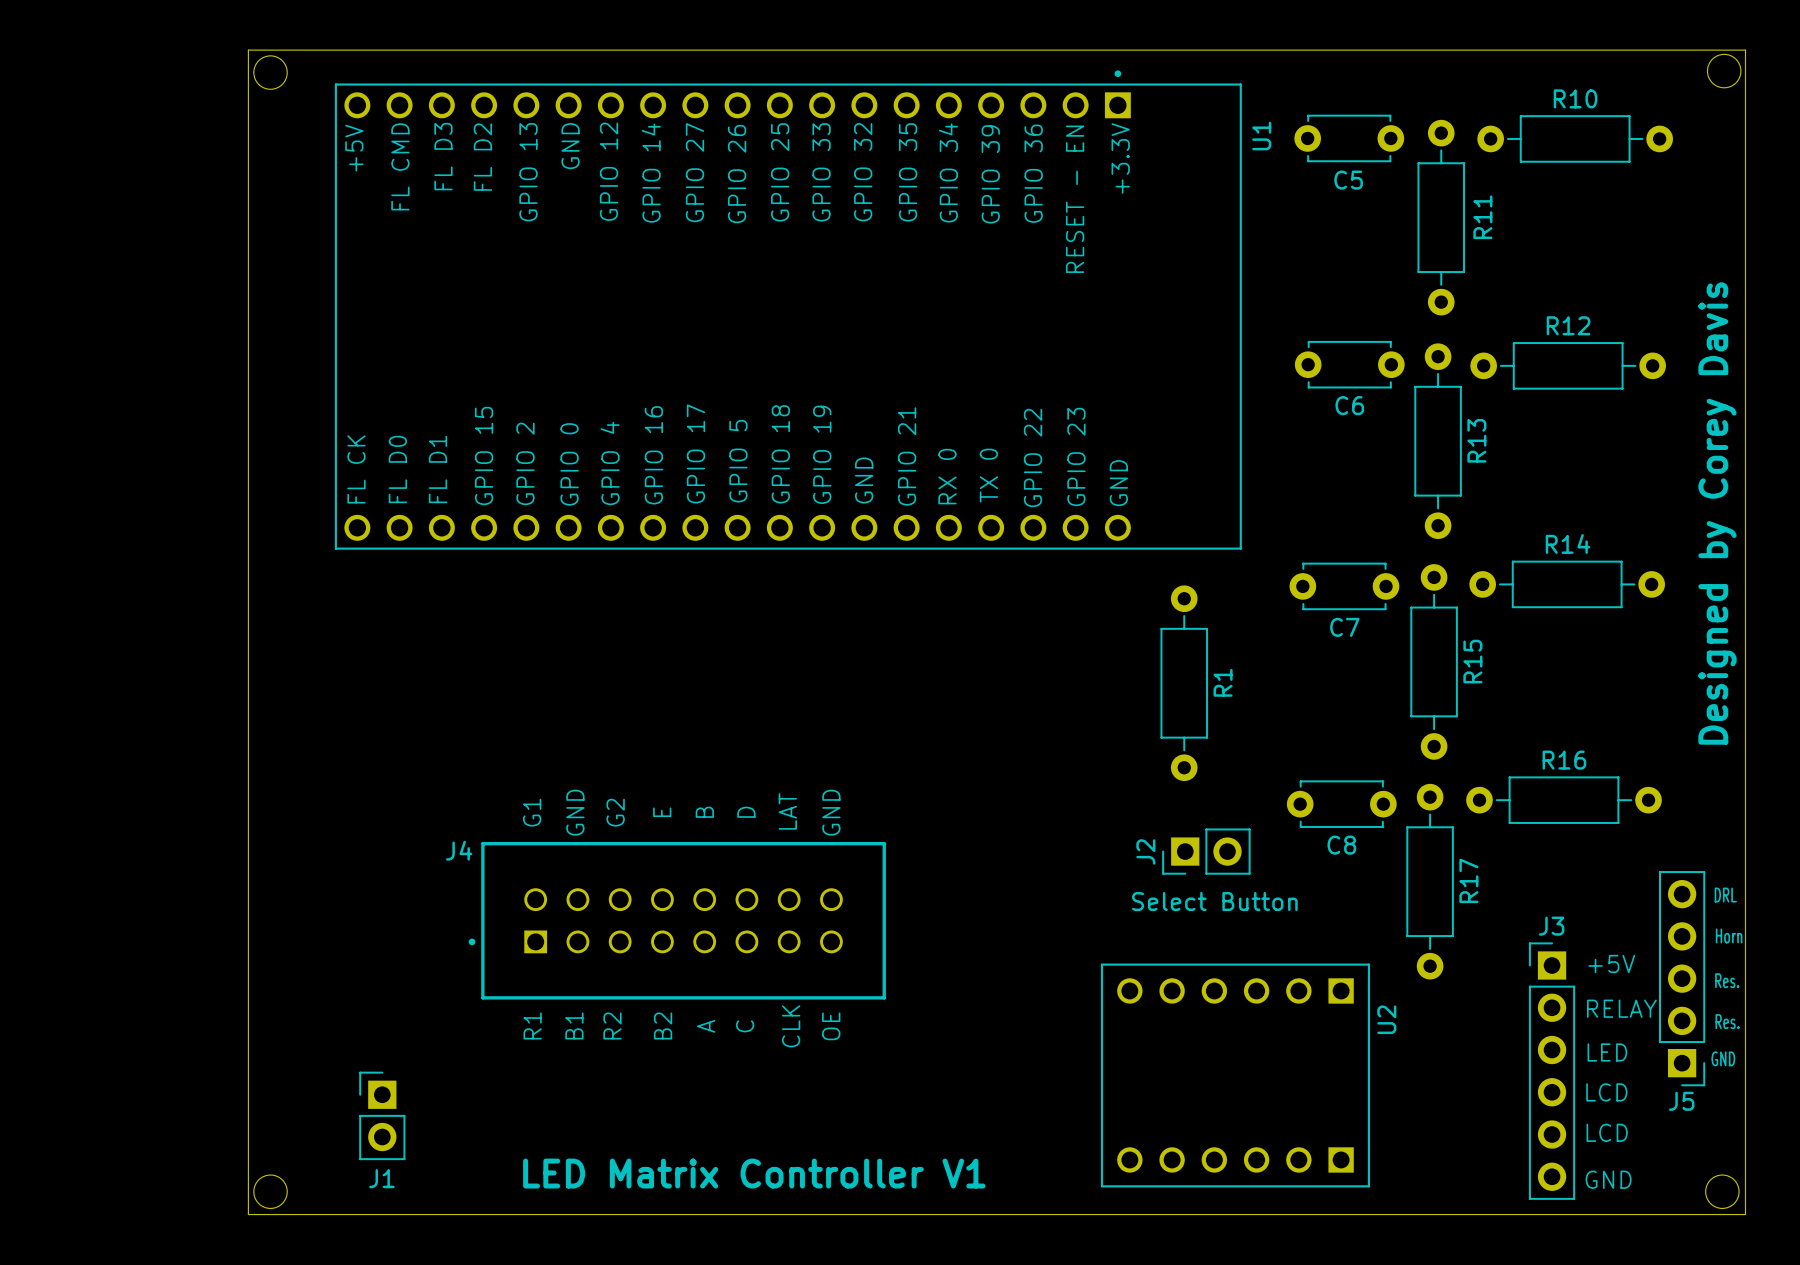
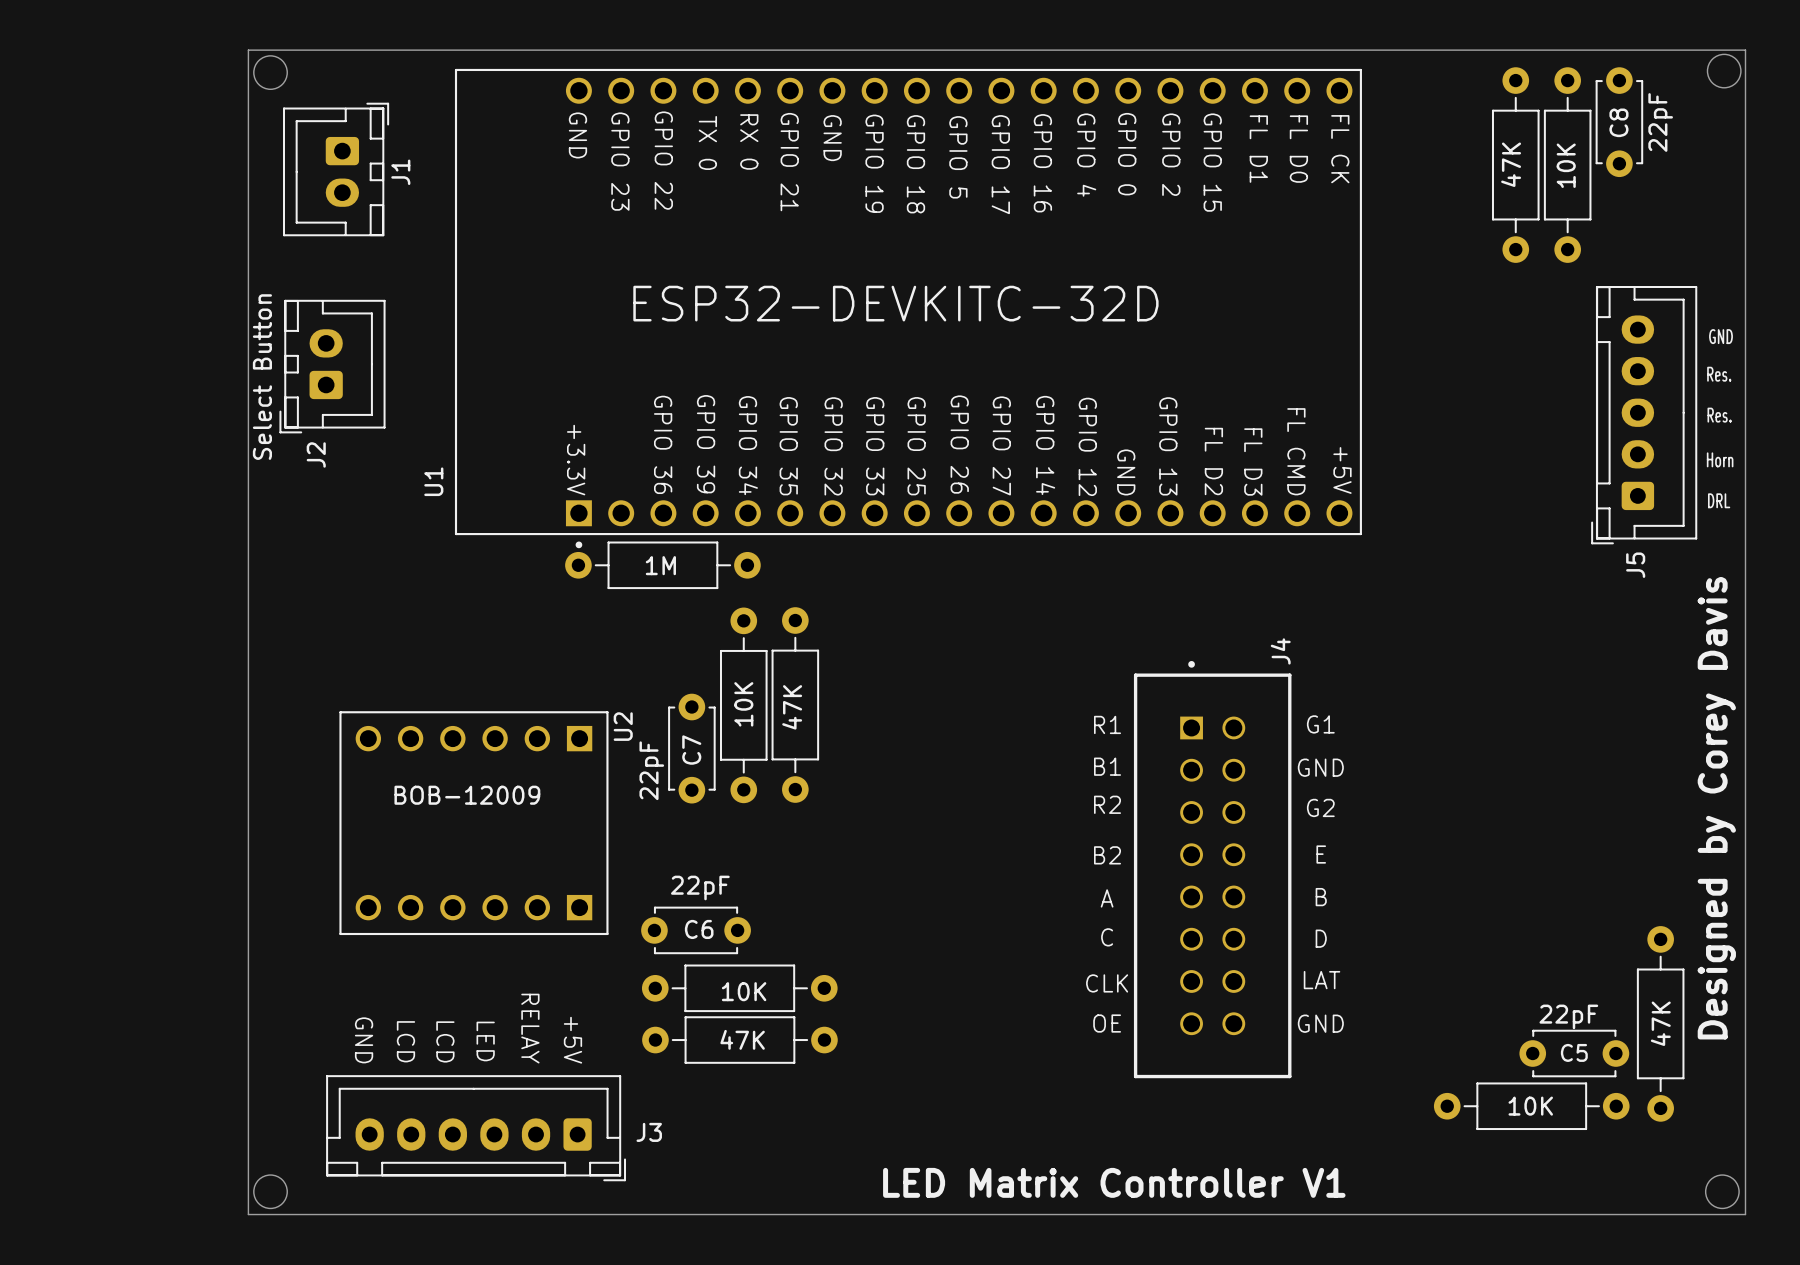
C8 value: none -> 22pF (1660, 122)
text: none -> GND (832, 138)
C5 position: (1349, 138) -> (1574, 1053)
R10: (1575, 138) -> none
text: none -> RX 0 (749, 141)
text: none -> TX 0 (707, 142)
text rotation: 0° (570, 146) -> 180° (577, 135)
text: +5V (354, 148) -> none
text: none -> FL D1 (1258, 149)
text: none -> FL D0 (1298, 149)
text: none -> FL CK (1340, 149)
text: none -> GPIO 0 (1127, 154)
text: none -> GPIO 2 (1171, 154)
text: none -> GPIO 4 (1086, 155)
text: FL D3 (443, 156) -> none
text: FL D2 (482, 157) -> none
text: none -> GPIO 5 (958, 157)
text: +3.3V (1120, 158) -> none
text: none -> GPIO 22 (663, 160)
text: none -> GPIO 21 (789, 162)
text: none -> GPIO 15 (1212, 162)
text: none -> GPIO 16 (1042, 163)
text: none -> GPIO 17 (1000, 164)
part: none -> 47K (1515, 165)
part: none -> 10K (1567, 165)
text: FL CMD (400, 166) -> none
text: GPIO 12 (609, 171) -> GPIO 23 (620, 161)
text: GPIO 13 (528, 172) -> none
text rotation: 0° (695, 172) -> 180° (1001, 445)
text position: GPIO 27 (695, 172) -> GPIO 27 (1001, 445)
text rotation: 0° (780, 172) -> 180° (916, 446)
text position: GPIO 25 (780, 172) -> GPIO 25 (916, 446)
text rotation: 0° (821, 172) -> 180° (875, 446)
text position: GPIO 33 (821, 172) -> GPIO 33 (875, 446)
text rotation: 0° (863, 172) -> 180° (833, 446)
text position: GPIO 32 (863, 172) -> GPIO 32 (833, 446)
text rotation: 0° (908, 172) -> 180° (788, 446)
text position: GPIO 35 (908, 172) -> GPIO 35 (788, 446)
text rotation: 0° (948, 172) -> 180° (748, 445)
text position: GPIO 34 (948, 172) -> GPIO 34 (748, 445)
text rotation: 0° (651, 173) -> 180° (1045, 445)
text position: GPIO 14 (651, 173) -> GPIO 14 (1045, 445)
text: GPIO 36 (1033, 173) -> none
text rotation: 0° (737, 174) -> 180° (959, 444)
text position: GPIO 26 (737, 174) -> GPIO 26 (959, 444)
text rotation: 0° (990, 174) -> 180° (706, 444)
text position: GPIO 39 (990, 174) -> GPIO 39 (706, 444)
C5 name position: C5 (1348, 180) -> C5 (1574, 1052)
text: RESET - EN (1075, 199) -> none
R11: (1441, 217) -> none
U1 value: none -> ESP32-DEVKITC-32D (895, 303)
U1 rotation: 0° (788, 310) -> 180° (908, 308)
text: none -> GND (1721, 336)
C6 position: (1349, 364) -> (696, 930)
R12: (1568, 365) -> none
text: none -> Res. (1719, 374)
C6 name position: C6 (1349, 405) -> C6 (699, 929)
text: none -> Res. (1719, 415)
R13: (1438, 441) -> none
text: none -> GPIO 36 (663, 444)
text: none -> GPIO 13 (1168, 446)
text: none -> FL CMD (1296, 451)
text: GPIO 17 (695, 453) -> none
text rotation: 0° (780, 454) -> 180° (915, 164)
text position: GPIO 18 (780, 454) -> GPIO 18 (915, 164)
text rotation: 0° (822, 454) -> 180° (874, 163)
text position: GPIO 19 (822, 454) -> GPIO 19 (874, 163)
text: GPIO 15 (484, 455) -> none
text: GPIO 16 (653, 455) -> none
text: GPIO 21 (907, 456) -> none
text: GPIO 23 (1076, 456) -> GPIO 12 (1087, 446)
text: GPIO 22 (1033, 457) -> none
text: none -> Horn (1720, 459)
text: none -> +3.3V (576, 460)
text: GPIO 5 (738, 461) -> none
text: none -> FL D2 (1213, 461)
text: none -> FL D3 (1253, 461)
text: GPIO 2 (525, 463) -> none
text: GPIO 4 (610, 463) -> none
text: GPIO 0 (569, 464) -> none
text: FL CK (356, 469) -> none
text: FL D0 (397, 469) -> none
text: FL D1 (438, 469) -> none
text: none -> +5V (1342, 470)
text: TX 0 (988, 475) -> none
text: RX 0 (947, 476) -> none
text: GND (864, 480) -> none
text rotation: 0° (1118, 483) -> 180° (1126, 472)
text position: Designed by Corey Davis (1717, 513) -> Designed by Corey Davis (1716, 808)
part: none -> 1M (662, 565)
R14: (1567, 584) -> none
C7 rotation: 0° (1344, 586) -> 90° clockwise (691, 748)
C7 position: (1344, 586) -> (691, 748)
C7 name position: C7 (1344, 627) -> C7 (691, 750)
R15: (1434, 661) -> none
R1: (1184, 683) -> none
part: none -> 10K (743, 705)
part: none -> 47K (795, 705)
text: none -> R1 (1107, 724)
text: none -> G1 (1320, 724)
text: none -> B1 (1107, 766)
text: none -> GND (1320, 767)
C7 value: none -> 22pF (651, 770)
U2 value: none -> BOB-12009 (467, 795)
R16: (1564, 800) -> none
text: none -> R2 (1107, 804)
C8 rotation: 0° (1341, 804) -> 90° clockwise (1619, 122)
C8 position: (1341, 804) -> (1619, 122)
text: none -> G2 (1320, 807)
text: LAT (787, 811) -> none
text: G1 (532, 812) -> none
text: GND (575, 812) -> none
text: G2 (615, 812) -> none
text: E (662, 812) -> none
text: B (704, 812) -> none
text: D (746, 812) -> none
text: GND (831, 812) -> none
J2 footprint: [1162, 828, 1251, 875] -> [279, 299, 386, 434]
C8 name position: C8 (1341, 845) -> C8 (1618, 122)
J2 name position: J2 (1145, 851) -> J2 (316, 454)
text: none -> E (1321, 854)
text: none -> B2 (1107, 855)
J5 footprint: [1658, 871, 1706, 1087] -> [1591, 286, 1698, 545]
R17: (1430, 881) -> none
C6 value: none -> 22pF (700, 887)
text position: DRL (1725, 895) -> DRL (1719, 500)
text: none -> B (1321, 897)
J2 value position: Select Button (1214, 901) -> Select Button (262, 377)
J4 rotation: 0° (677, 920) -> 90° clockwise (1212, 869)
J4 position: (677, 920) -> (1212, 869)
J3 name position: J3 (1551, 926) -> J3 (649, 1132)
text: Horn (1729, 935) -> none
text: none -> D (1321, 938)
J3 footprint: [1528, 942, 1576, 1200] -> [326, 1075, 627, 1182]
text: +5V (1611, 963) -> none
text: none -> LAT (1322, 980)
text: Res. (1727, 980) -> none
part: none -> 10K (739, 988)
text: RELAY (1621, 1008) -> none
C5 value: none -> 22pF (1568, 1016)
U2 name position: U2 (1386, 1019) -> U2 (623, 726)
text: Res. (1727, 1021) -> none
text: none -> GND (1320, 1023)
part: none -> 47K (1660, 1023)
text: R1 (532, 1025) -> none
text: B1 (574, 1025) -> none
text: R2 (612, 1025) -> none
text: B2 (663, 1025) -> none
text rotation: 0° (706, 1026) -> 90° clockwise (1107, 898)
text position: A (706, 1026) -> A (1107, 898)
text rotation: 0° (745, 1026) -> 90° clockwise (1107, 937)
text position: C (745, 1026) -> C (1107, 937)
text rotation: 0° (791, 1026) -> 90° clockwise (1107, 983)
text position: CLK (791, 1026) -> CLK (1107, 983)
text rotation: 0° (831, 1026) -> 90° clockwise (1107, 1023)
text position: OE (831, 1026) -> OE (1107, 1023)
text: none -> RELAY (530, 1028)
text: none -> GND (364, 1040)
text: none -> +5V (572, 1040)
part: none -> 47K (739, 1040)
text: none -> LCD (405, 1041)
text: none -> LCD (445, 1041)
text: none -> LED (485, 1041)
text: LED (1607, 1052) -> none
text: GND (1723, 1058) -> none
J1 footprint: [359, 1071, 406, 1161] -> [283, 102, 390, 237]
U2 position: (1235, 1075) -> (473, 823)
text: LCD (1606, 1092) -> none
part: none -> 10K (1531, 1106)
text: LCD (1607, 1132) -> none
text position: LED Matrix Controller V1 (754, 1173) -> LED Matrix Controller V1 (1114, 1182)
J1 name position: J1 (381, 1178) -> J1 (400, 172)
text: GND (1608, 1179) -> none

